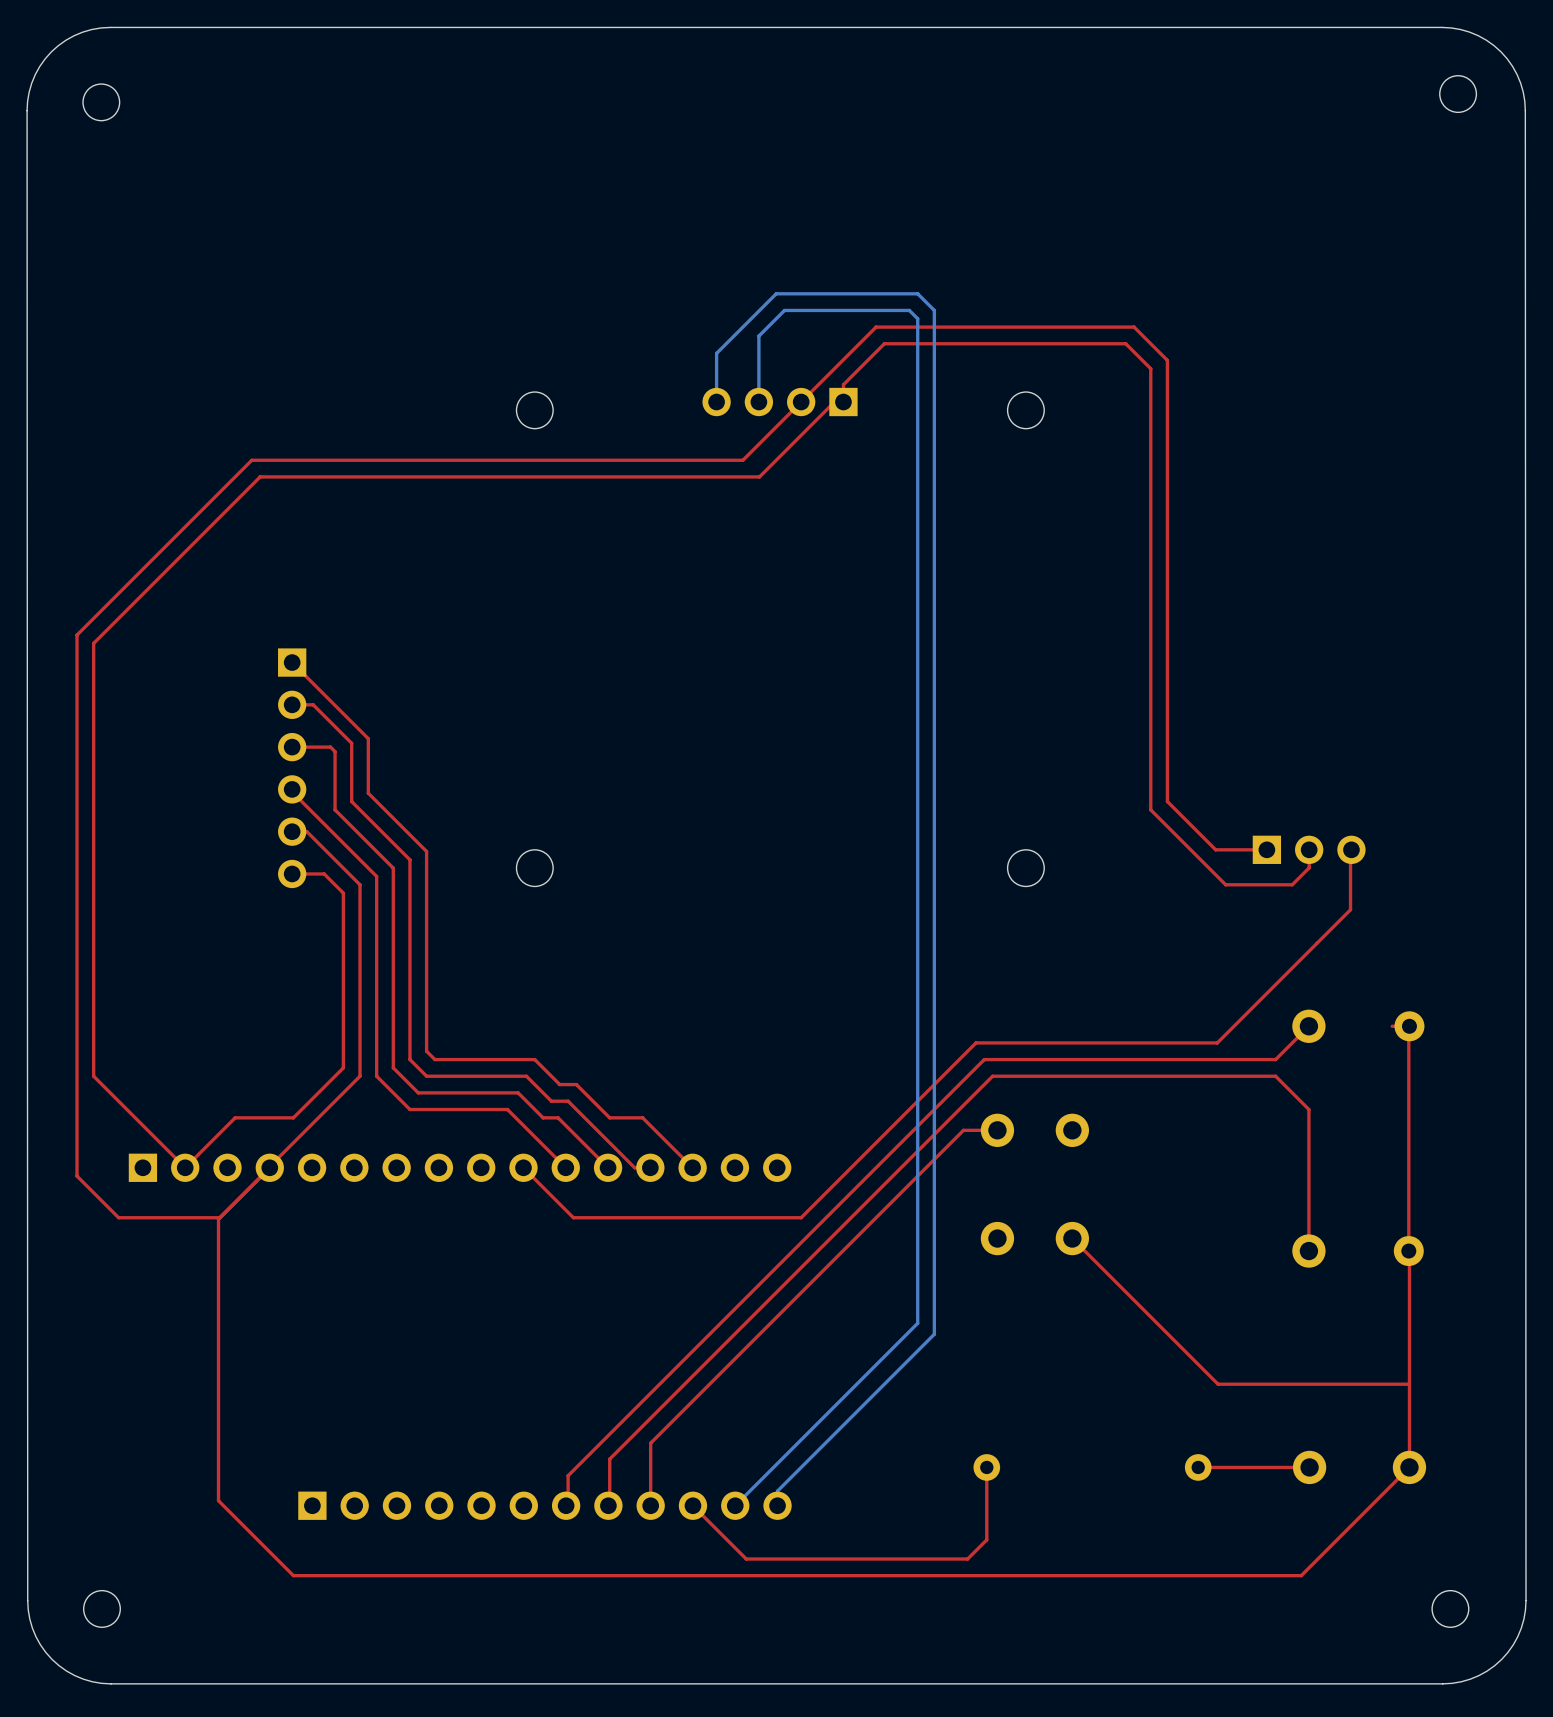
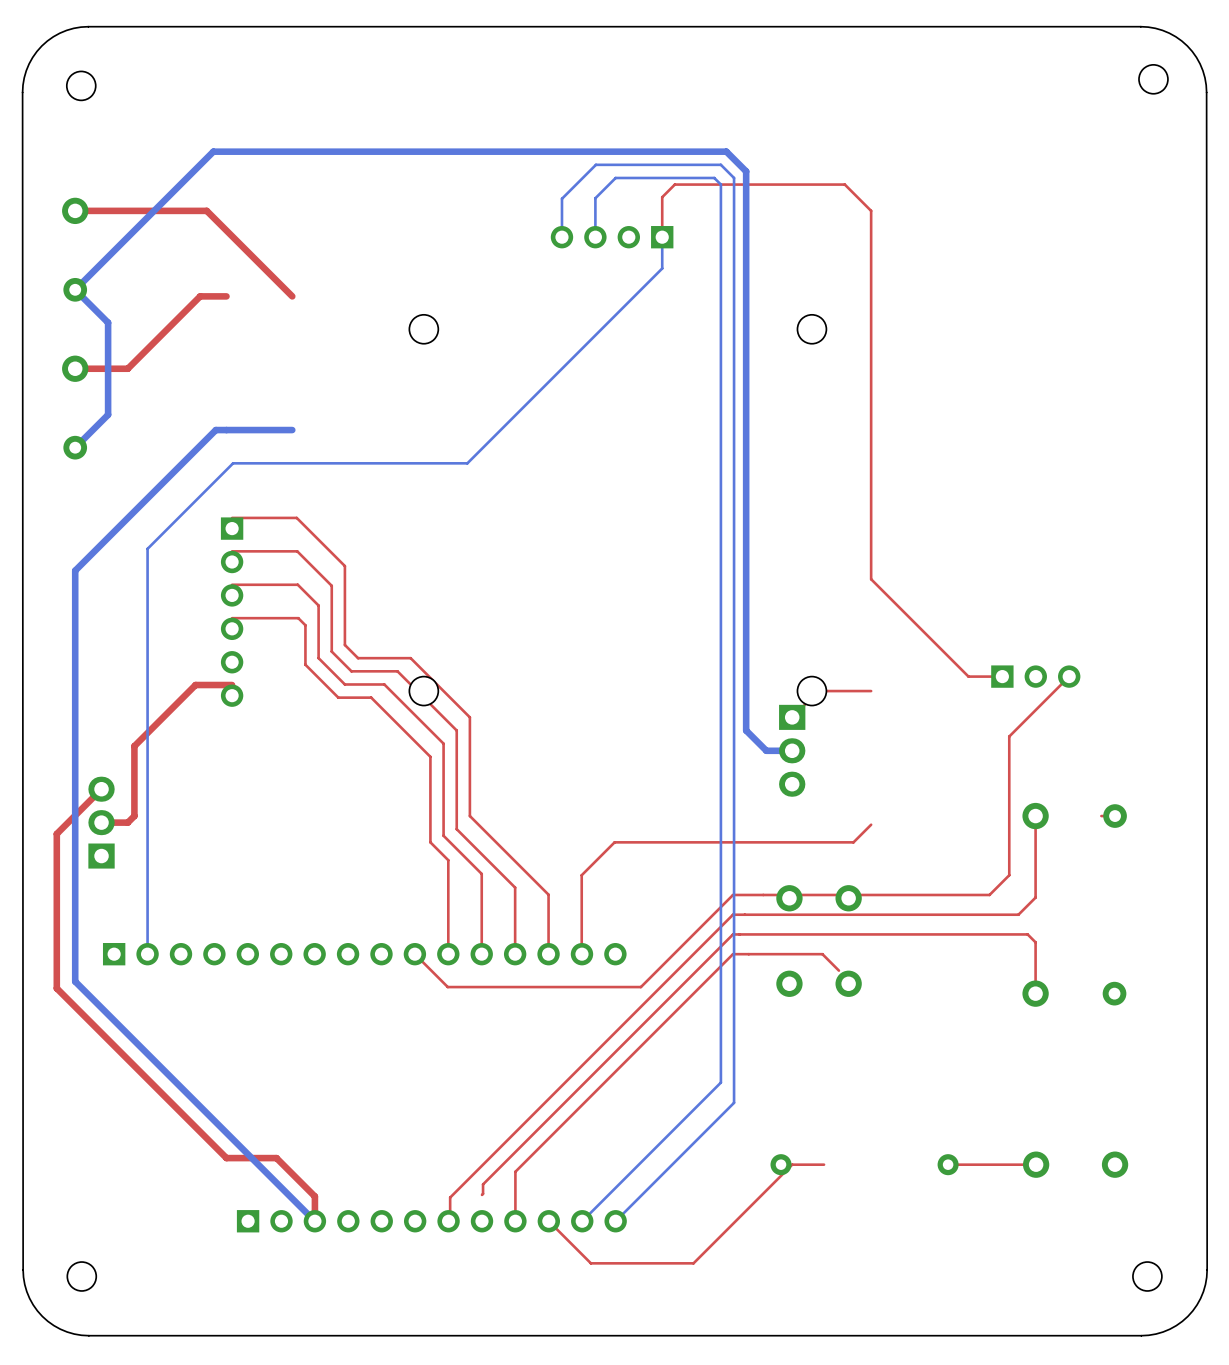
top track: none -> (75, 210) (206, 210) (292, 296)
part: none -> (75, 210)
part: none -> (612, 237)
bottom track: none -> (662, 237) (662, 268) (467, 463) (233, 463) (147, 548) (147, 943)
bottom track: none -> (561, 243) (561, 198) (595, 164) (720, 164) (734, 177) (734, 1102) (615, 1221)
bottom track: none -> (595, 243) (595, 198) (615, 177) (714, 177) (720, 184) (720, 1082) (582, 1221)
part: none -> (75, 289)
top track: none -> (226, 296) (200, 296) (127, 368) (75, 368)
bottom track: (759, 401) (758, 336) (784, 310) (909, 310) (917, 318) (917, 1323) (735, 1505) -> none
bottom track: (716, 402) (716, 353) (776, 293) (917, 293) (934, 310) (934, 1334) (777, 1491) (777, 1505) -> none
part: (716, 402) -> none
part: (758, 402) -> none
part: (801, 402) -> none
part: (843, 402) -> none
part: none -> (75, 368)
bottom track: none -> (292, 430) (215, 430) (75, 570) (75, 981) (314, 1221)
bottom track: none -> (75, 447) (108, 414) (108, 322) (75, 289) (213, 151) (726, 151) (746, 171) (746, 730) (766, 750) (792, 750)
part: none -> (75, 447)
top track: none -> (232, 517) (296, 517) (344, 566) (344, 645) (358, 658) (410, 658) (469, 717) (469, 816) (548, 894) (548, 954)
top track: (292, 662) (368, 738) (368, 793) (401, 826) -> (232, 584) (297, 584) (318, 605) (318, 658)
top track: none -> (232, 551) (297, 551) (331, 585) (331, 651) (351, 671) (397, 671) (456, 730) (456, 829) (515, 887) (515, 954)
top track: (292, 704) (313, 704) (351, 743) (351, 801) (384, 834) -> (232, 618) (298, 618) (305, 625) (305, 664)
top track: (292, 747) (330, 747) (335, 751) (335, 809) (393, 868) (393, 1067) (418, 1092) (518, 1092) (543, 1117) (558, 1117) (608, 1167) -> none
top track: (292, 789) (292, 791) (376, 876) (376, 1076) (409, 1109) (507, 1109) (565, 1167) -> none
top track: (292, 831) (306, 831) (360, 884) (360, 1076) (218, 1219) (218, 1500) (293, 1575) (1301, 1575) (1409, 1467) (1409, 1251) -> none
top track: (1224, 849) (1215, 849) (1167, 801) (1167, 360) (1134, 327) (876, 327) (742, 460) (251, 460) (77, 635) (77, 1176) (118, 1217) (219, 1217) -> (968, 676) (871, 579) (871, 210) (844, 184) (674, 184) (662, 197) (662, 243)
top track: (1309, 849) (1309, 867) (1292, 884) (1225, 884) (1150, 809) (1150, 368) (1125, 343) (884, 343) (843, 384) (843, 402) (834, 402) (759, 476) (260, 476) (93, 643) (93, 1076) (185, 1167) (235, 1117) (293, 1117) (343, 1067) (343, 893) (324, 873) (292, 873) -> none
top track: (1350, 850) (1350, 909) (1217, 1042) (975, 1042) (801, 1217) (573, 1217) (523, 1167) -> (1068, 677) (1009, 736) (1009, 875) (989, 894) (733, 894) (640, 987) (447, 987) (414, 954)
top track: (426, 851) (426, 1051) (434, 1059) (534, 1059) (559, 1084) (576, 1084) (609, 1117) (642, 1117) (692, 1167) -> (338, 677) (344, 684) (384, 684) (443, 743) (443, 835) (481, 873) (481, 954)
top track: (409, 859) (409, 1059) (426, 1076) (526, 1076) (551, 1101) (568, 1101) (634, 1167) (650, 1167) -> (325, 684) (338, 697) (371, 697) (430, 756) (430, 842) (448, 860) (448, 954)
top track: none -> (233, 685) (195, 685) (134, 746) (134, 816) (127, 822) (101, 822) (105, 822)
top track: none -> (871, 691) (818, 691) (792, 717)
part: none -> (792, 750)
top track: none -> (101, 789) (56, 833) (56, 988) (226, 1158) (276, 1158) (314, 1196) (314, 1221)
top track: (1308, 1026) (1275, 1059) (1078, 1059) -> (871, 824) (853, 842)
top track: none -> (1035, 816) (1035, 881)
top track: (1408, 1026) (1408, 1251) -> none
part: none -> (101, 822)
top track: (984, 1059) (568, 1475) (568, 1503) (566, 1505) -> (779, 842) (614, 842) (581, 875) (581, 954)
top track: (1308, 1109) (1275, 1076) (992, 1076) (609, 1459) (609, 1492) -> (1035, 942) (1027, 934) (733, 934) (483, 1184)
top track: (1308, 1129) (1308, 1186) -> (1035, 897) (1018, 914) (733, 914) (450, 1197) (448, 1221)
top track: (997, 1130) (963, 1130) (650, 1443) (650, 1476) -> (838, 970) (822, 954) (733, 954) (515, 1171)
part position: (460, 1167) -> (364, 954)
top track: (1072, 1238) (1218, 1384) (1409, 1384) -> none
top track: (986, 1467) (986, 1539) (967, 1559) (746, 1559) (692, 1505) -> none
top track: none -> (824, 1164) (792, 1164) (693, 1263) (590, 1263) (548, 1221)
part position: (544, 1505) -> (431, 1221)
top track: none -> (515, 1194) (515, 1221)

